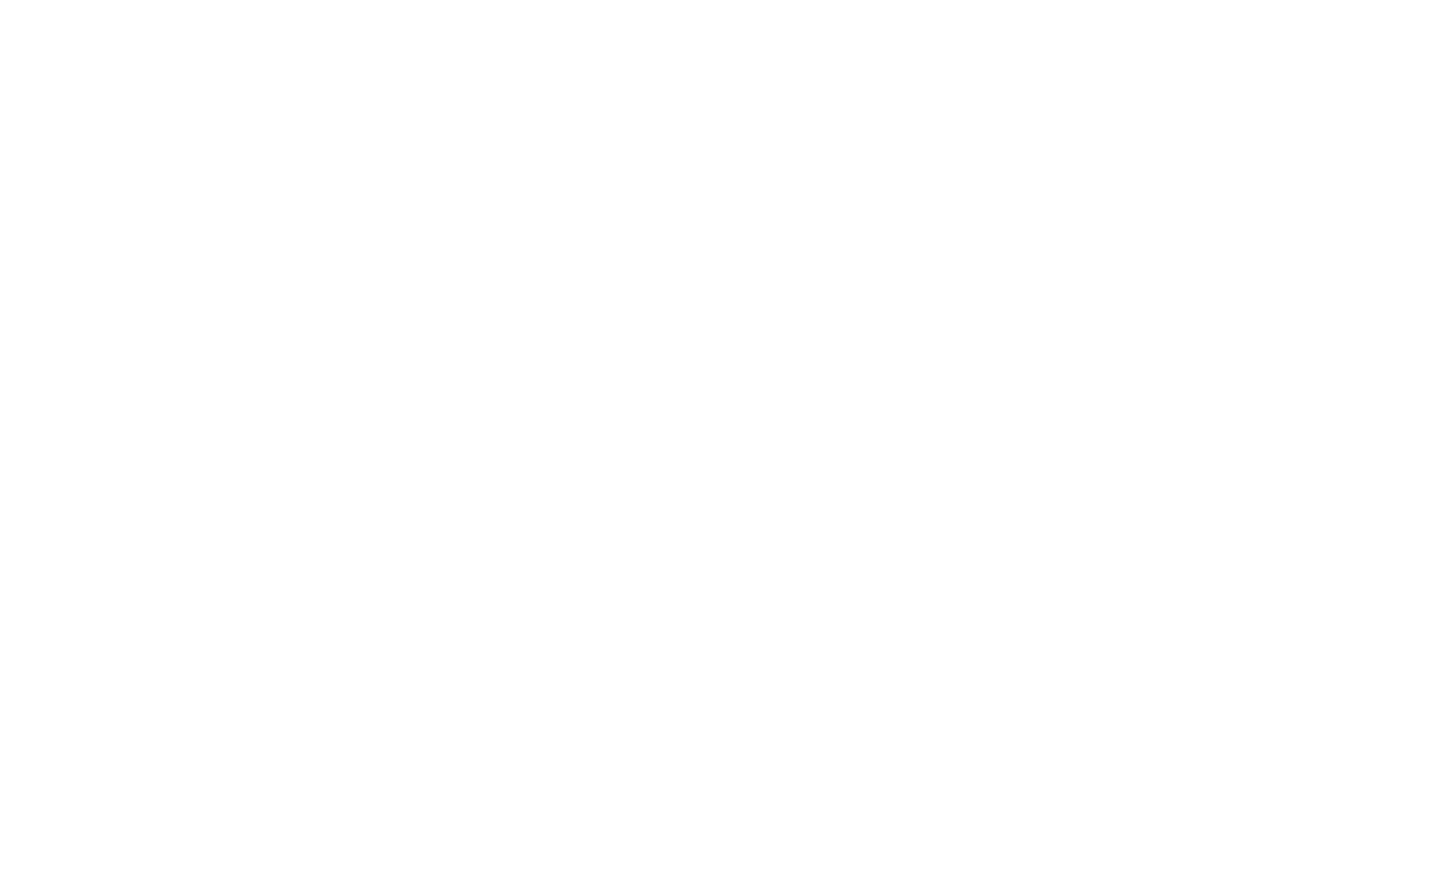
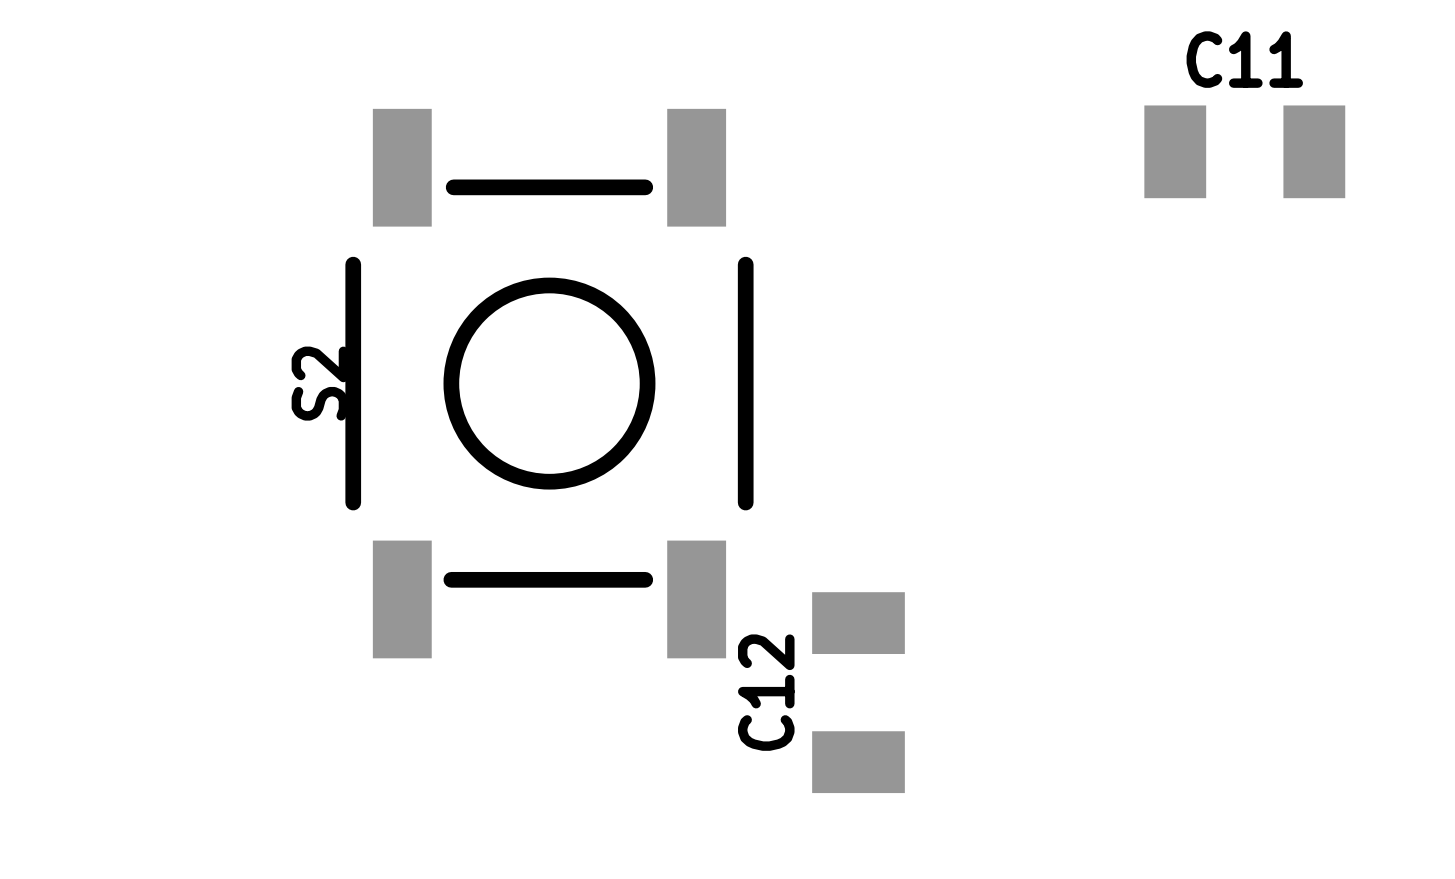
C11: none -> (1244, 151)
S2: none -> (549, 383)
C12: none -> (858, 692)

